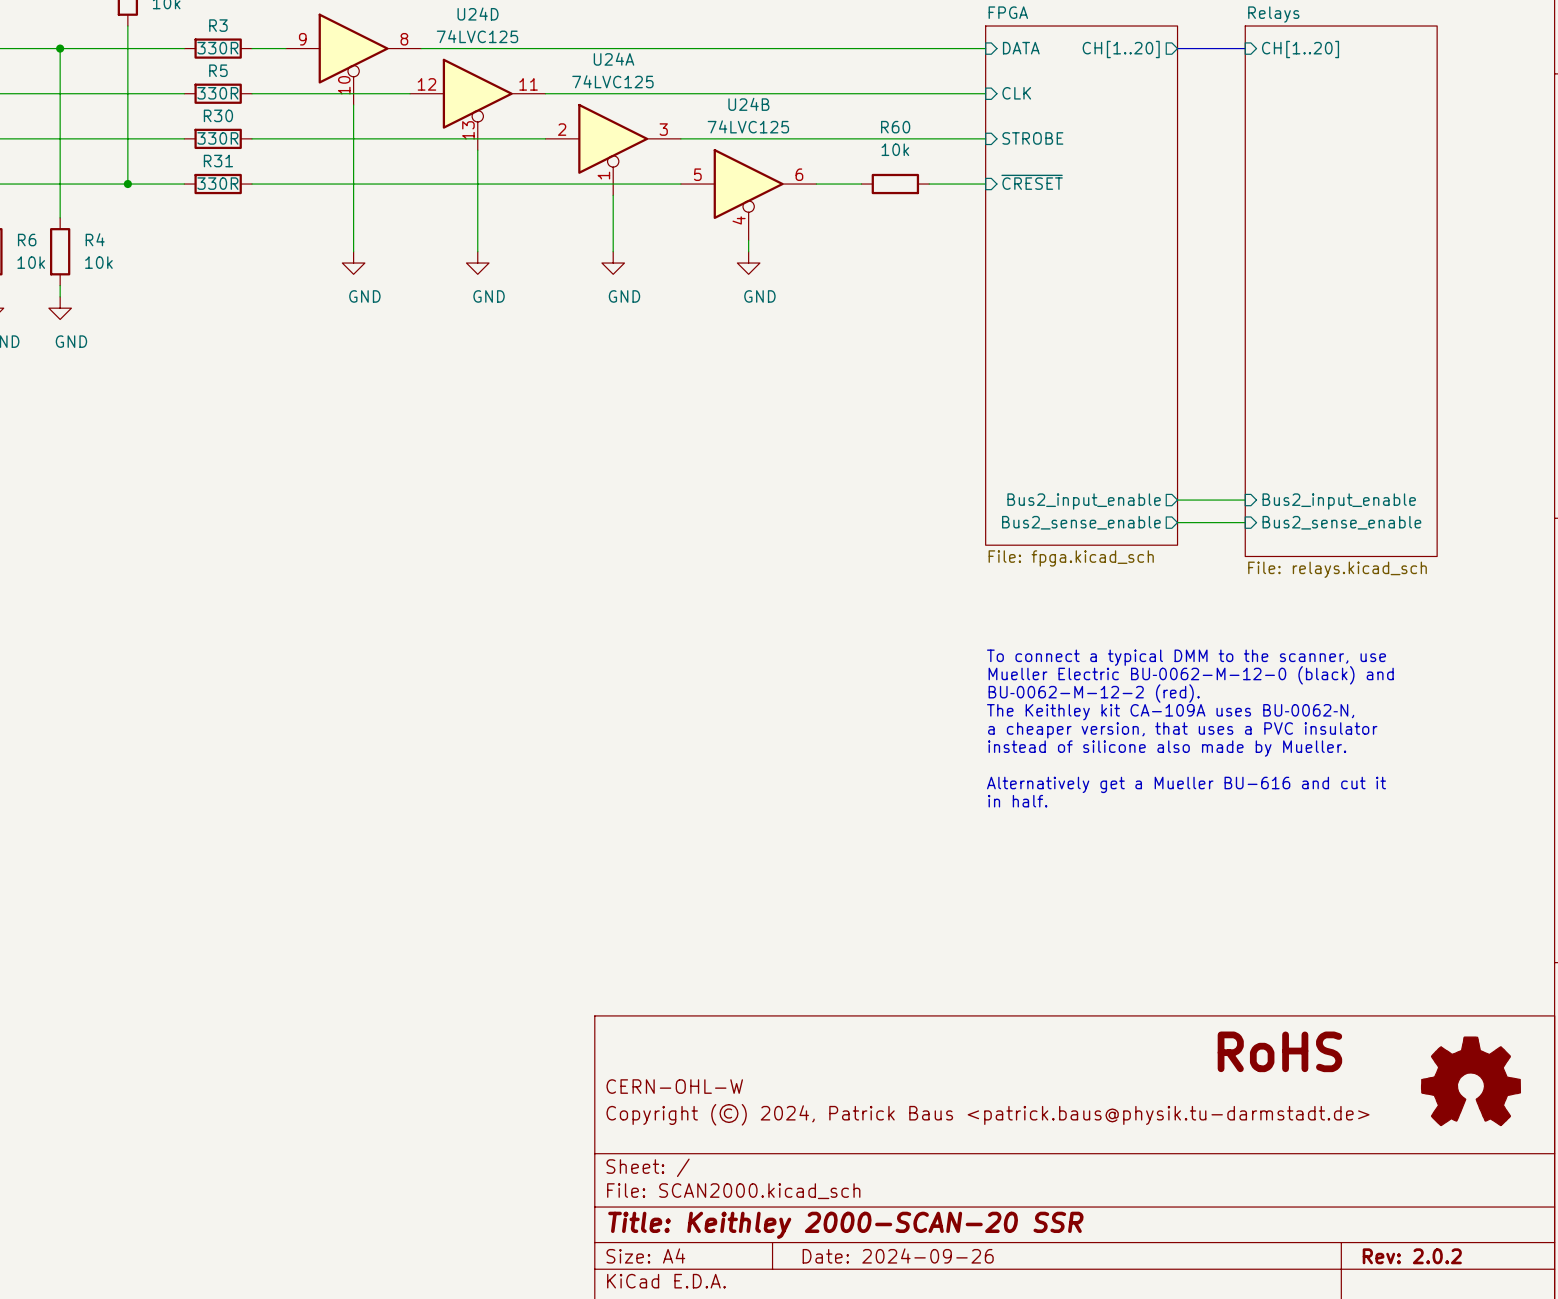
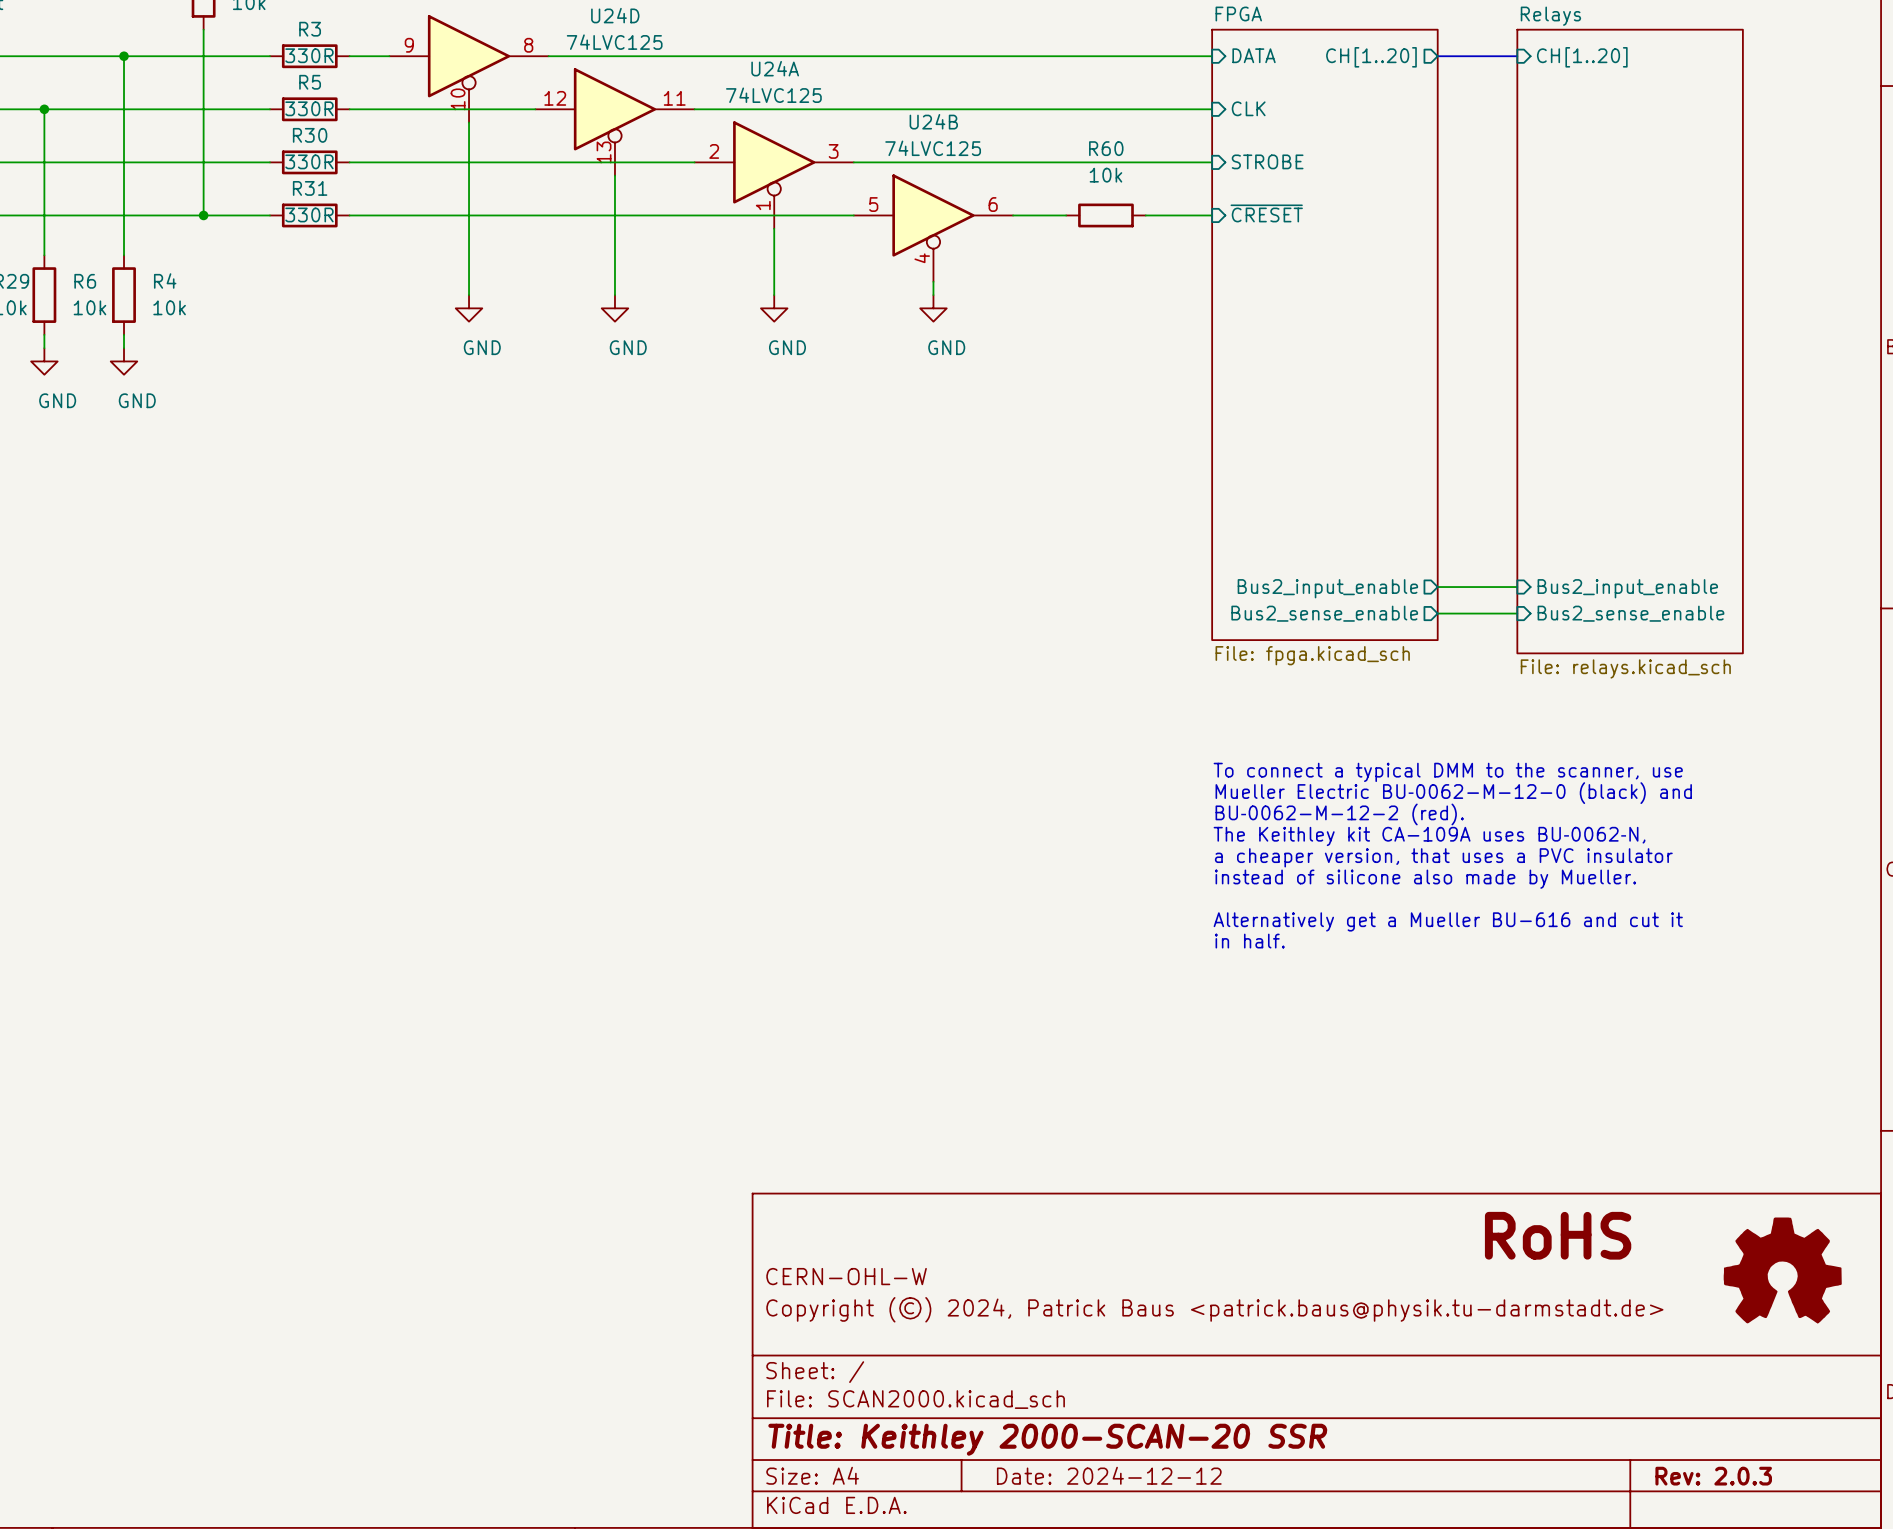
title block: Date: 2024-09-26 (898, 1255) -> Date: 2024-12-12 (1109, 1475)
title block: Rev: 2.0.2 (1412, 1256) -> Rev: 2.0.3 (1713, 1476)

